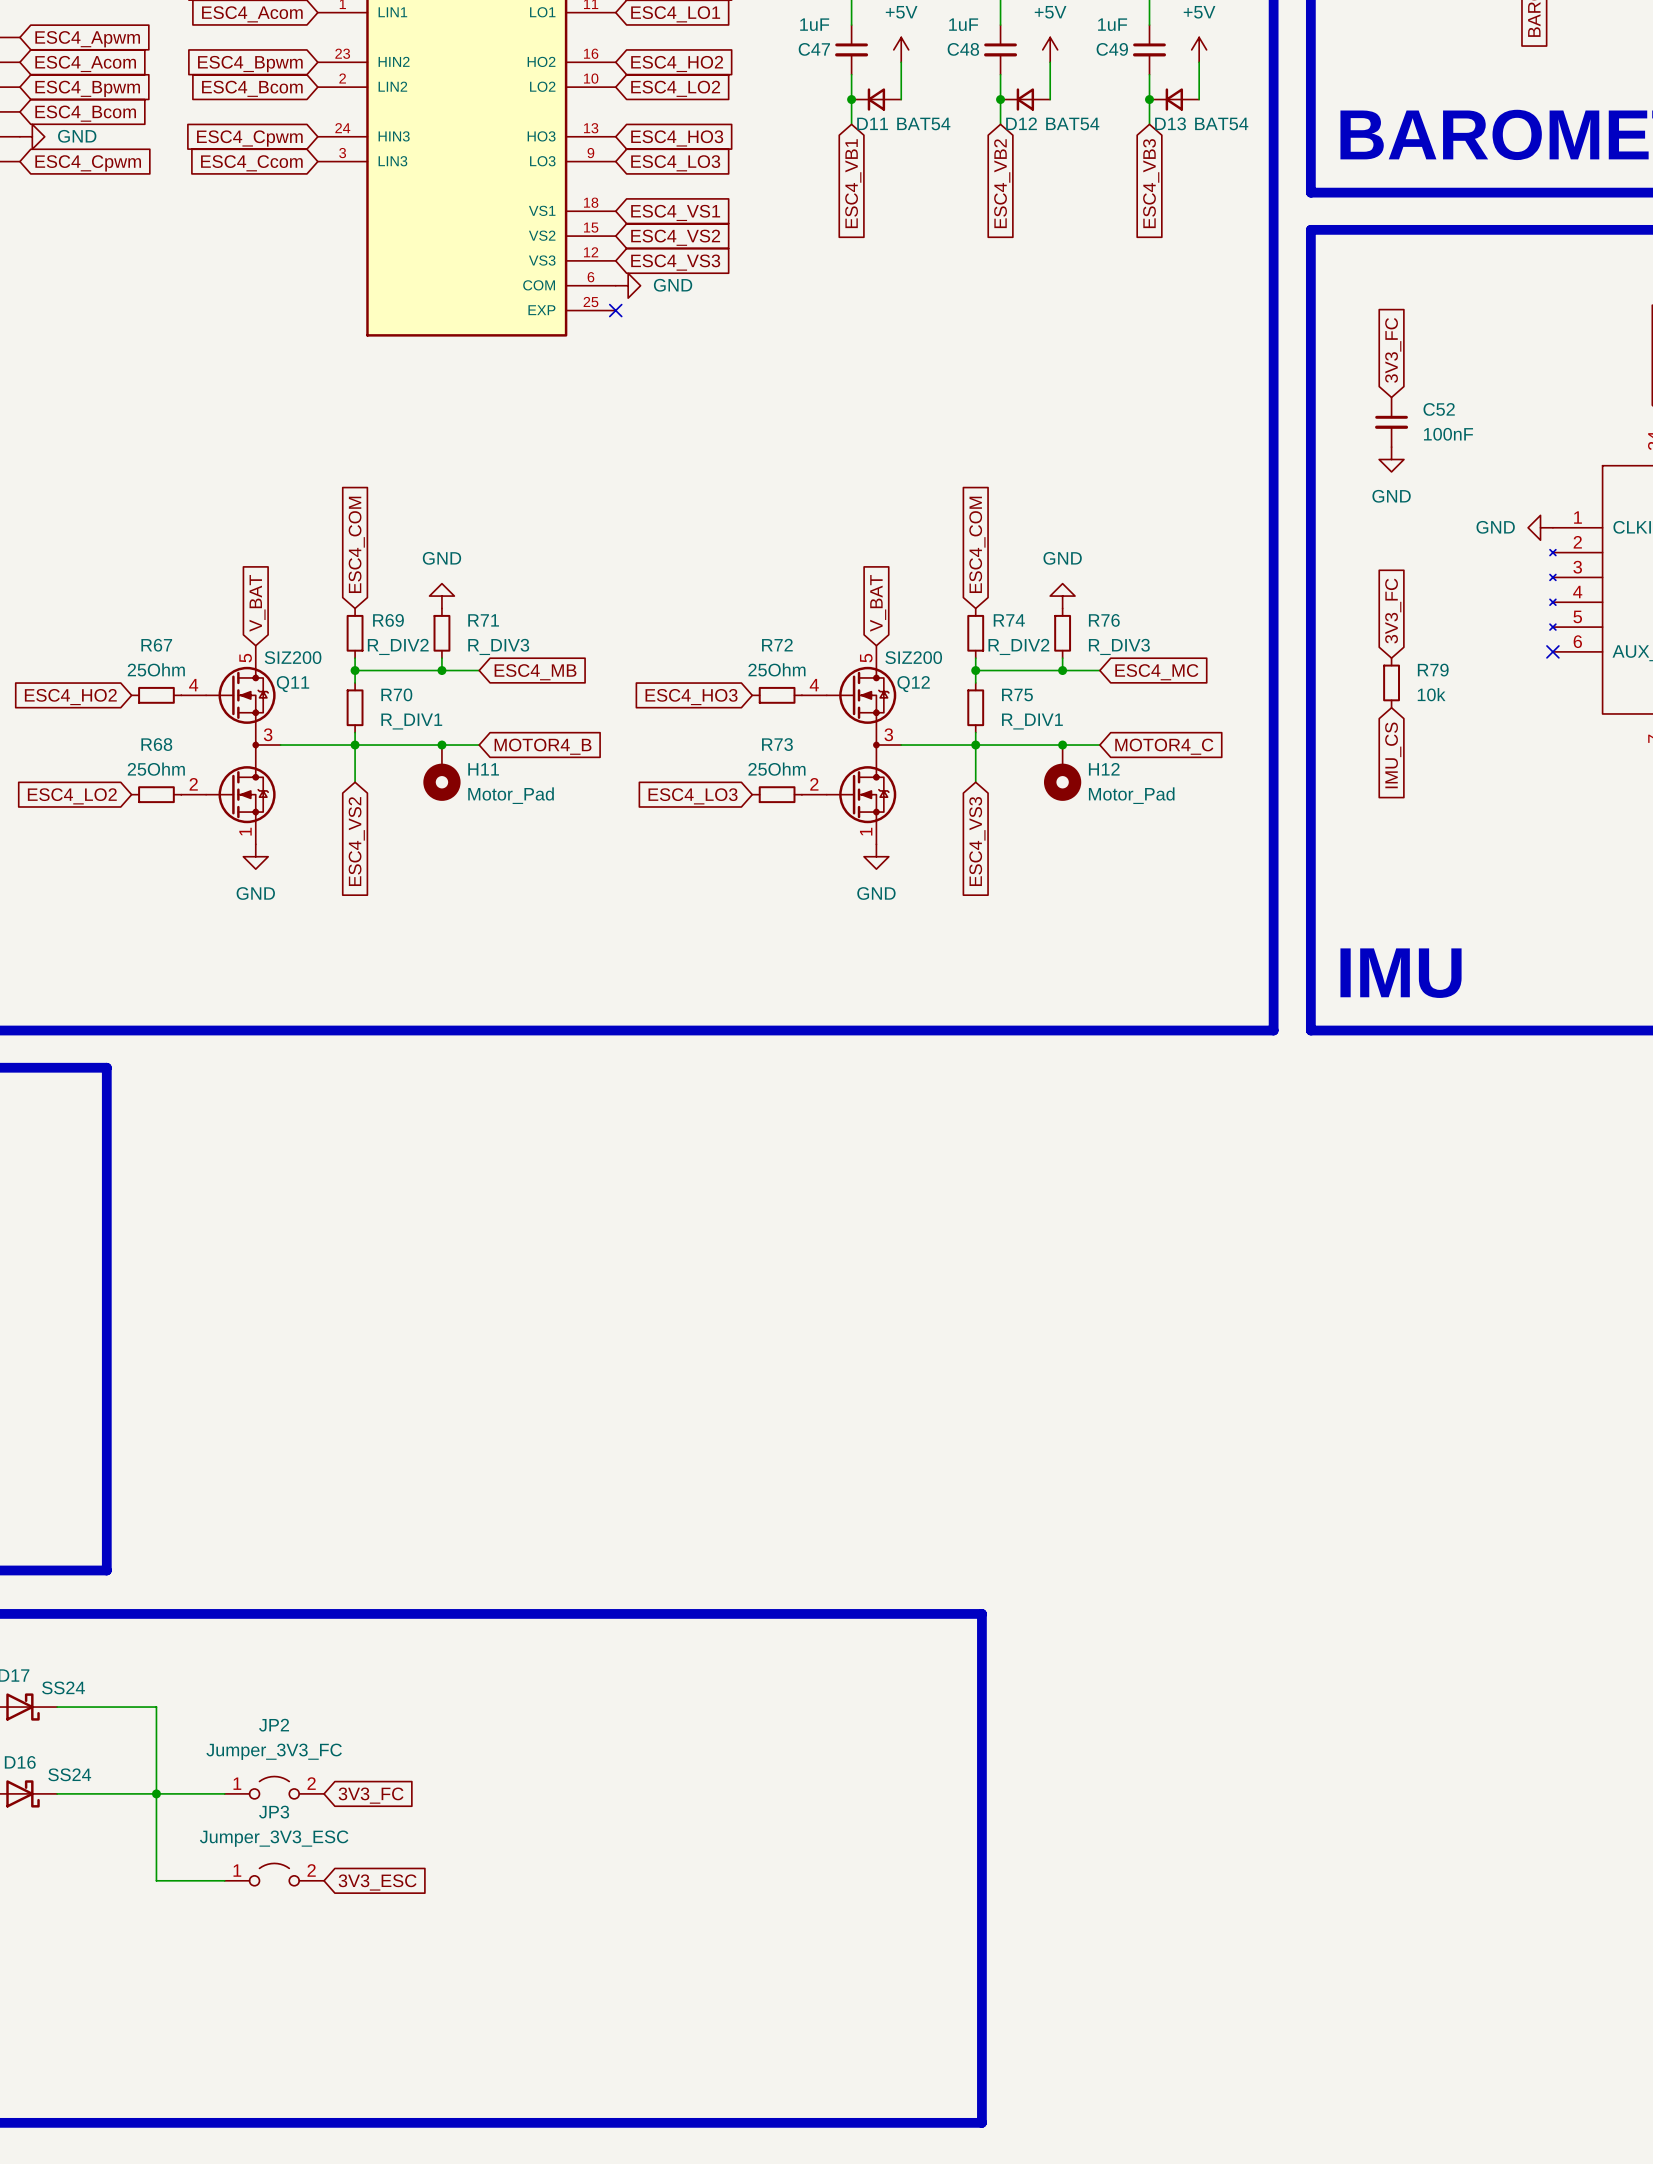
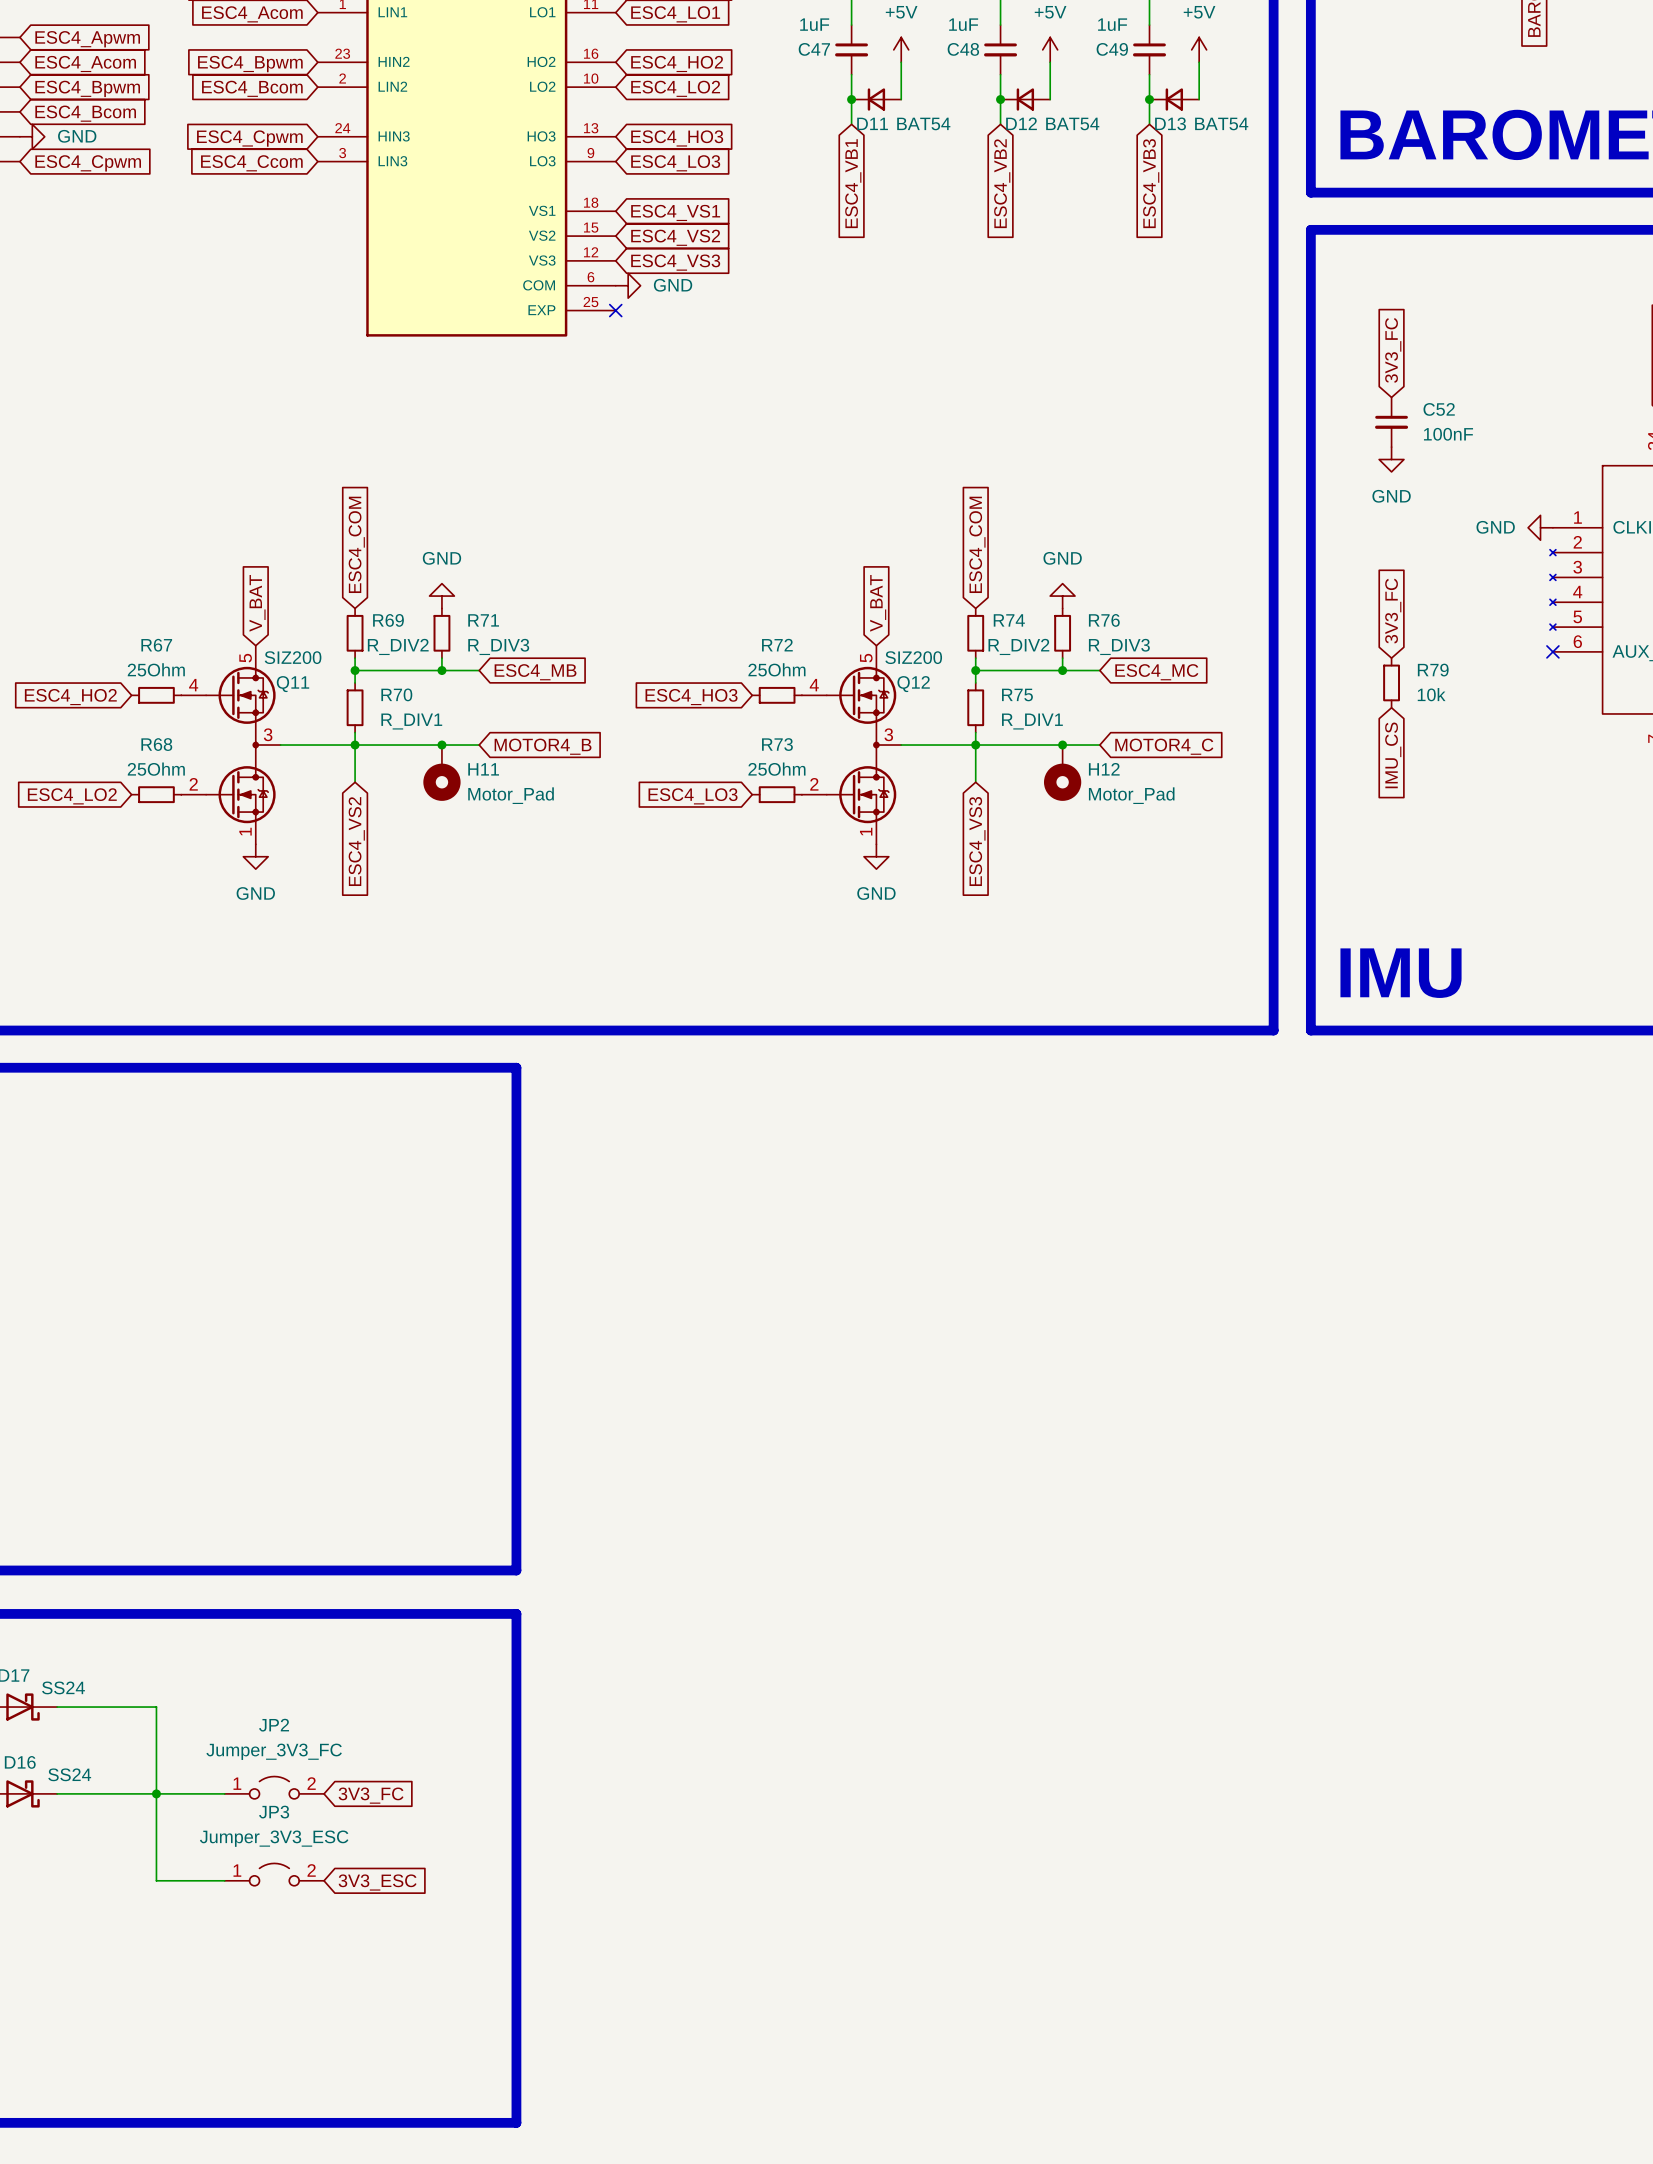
line: (106, 1067) (106, 1570) -> (106, 1067) (516, 1067) (516, 1570) (106, 1570)
line: (516, 1613) (981, 1613) (981, 2122) (516, 2122) -> (516, 1613) (516, 2122)

